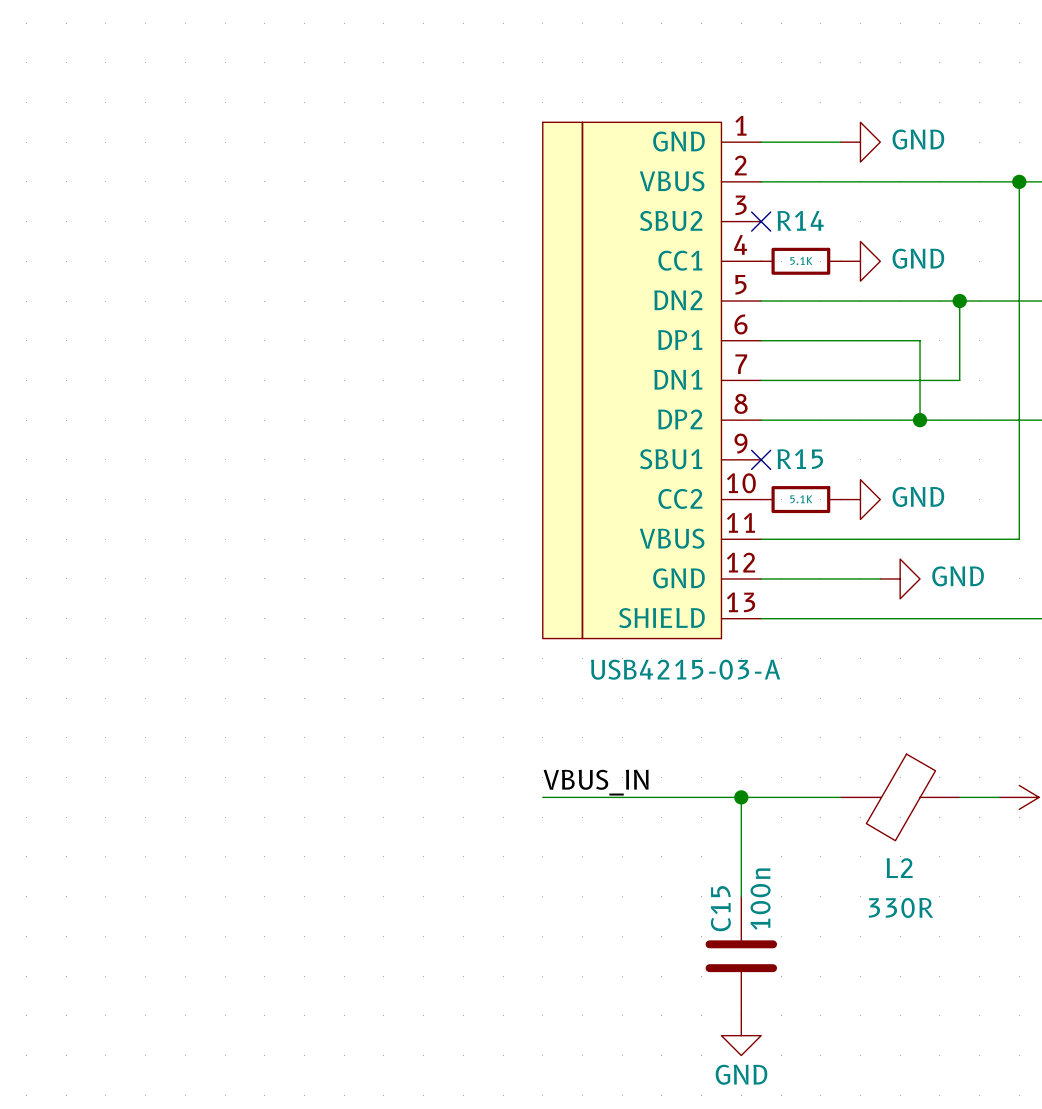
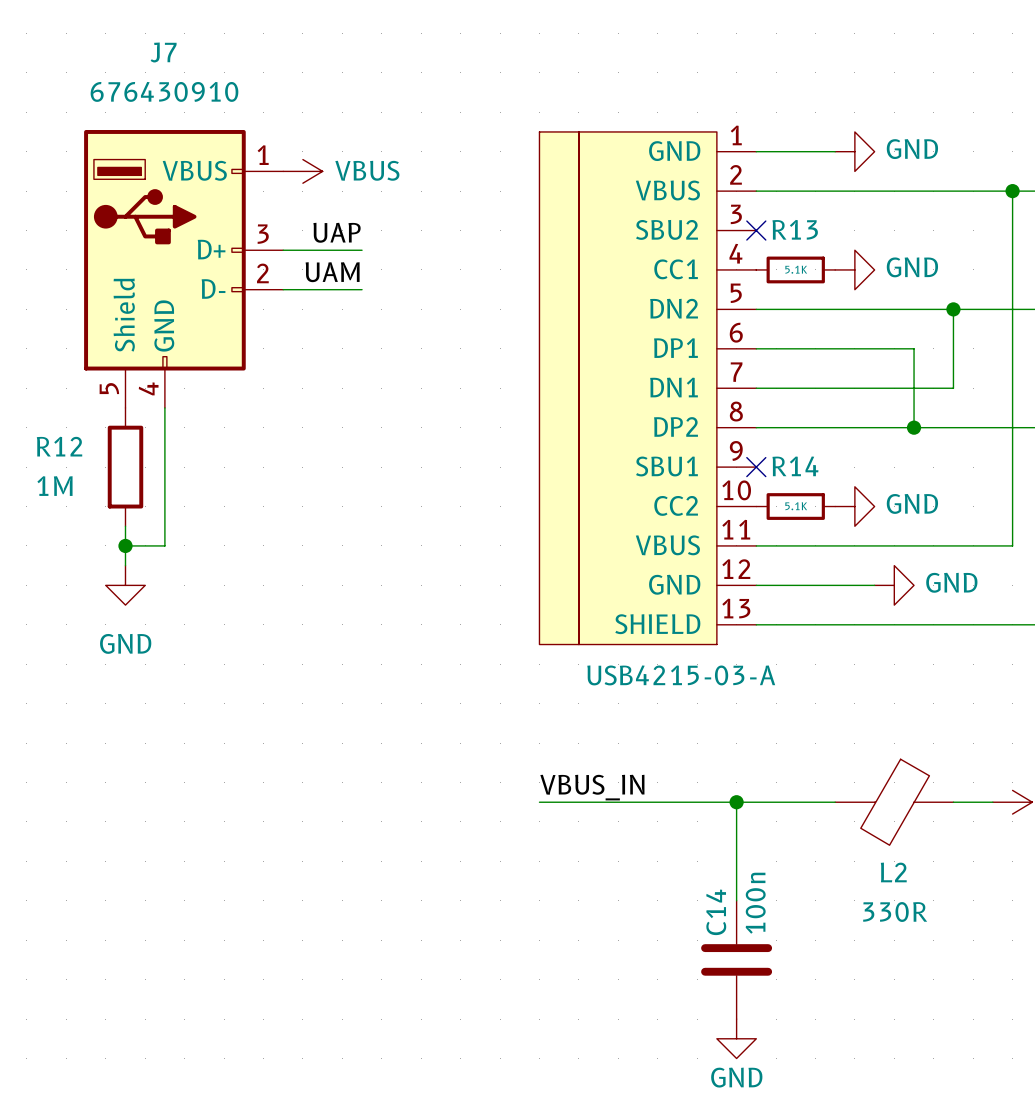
power symbol: none -> VBUS (302, 171)
R14 name: R14 (800, 220) -> R13 (795, 229)
label: none -> UAP (337, 232)
wire: none -> (283, 250) (362, 250)
J7: none -> 676430910 (183, 268)
label: none -> UAM (332, 272)
wire: none -> (283, 289) (362, 289)
wire: none -> (164, 407) (164, 545) (125, 545)
R12: none -> 1M (125, 467)
R15 name: R15 (800, 459) -> R14 (795, 466)
wire: none -> (125, 526) (125, 565)
junction: none -> (125, 545)
power symbol: none -> GND (125, 585)
C15 name: C15 (720, 908) -> C14 (716, 912)

